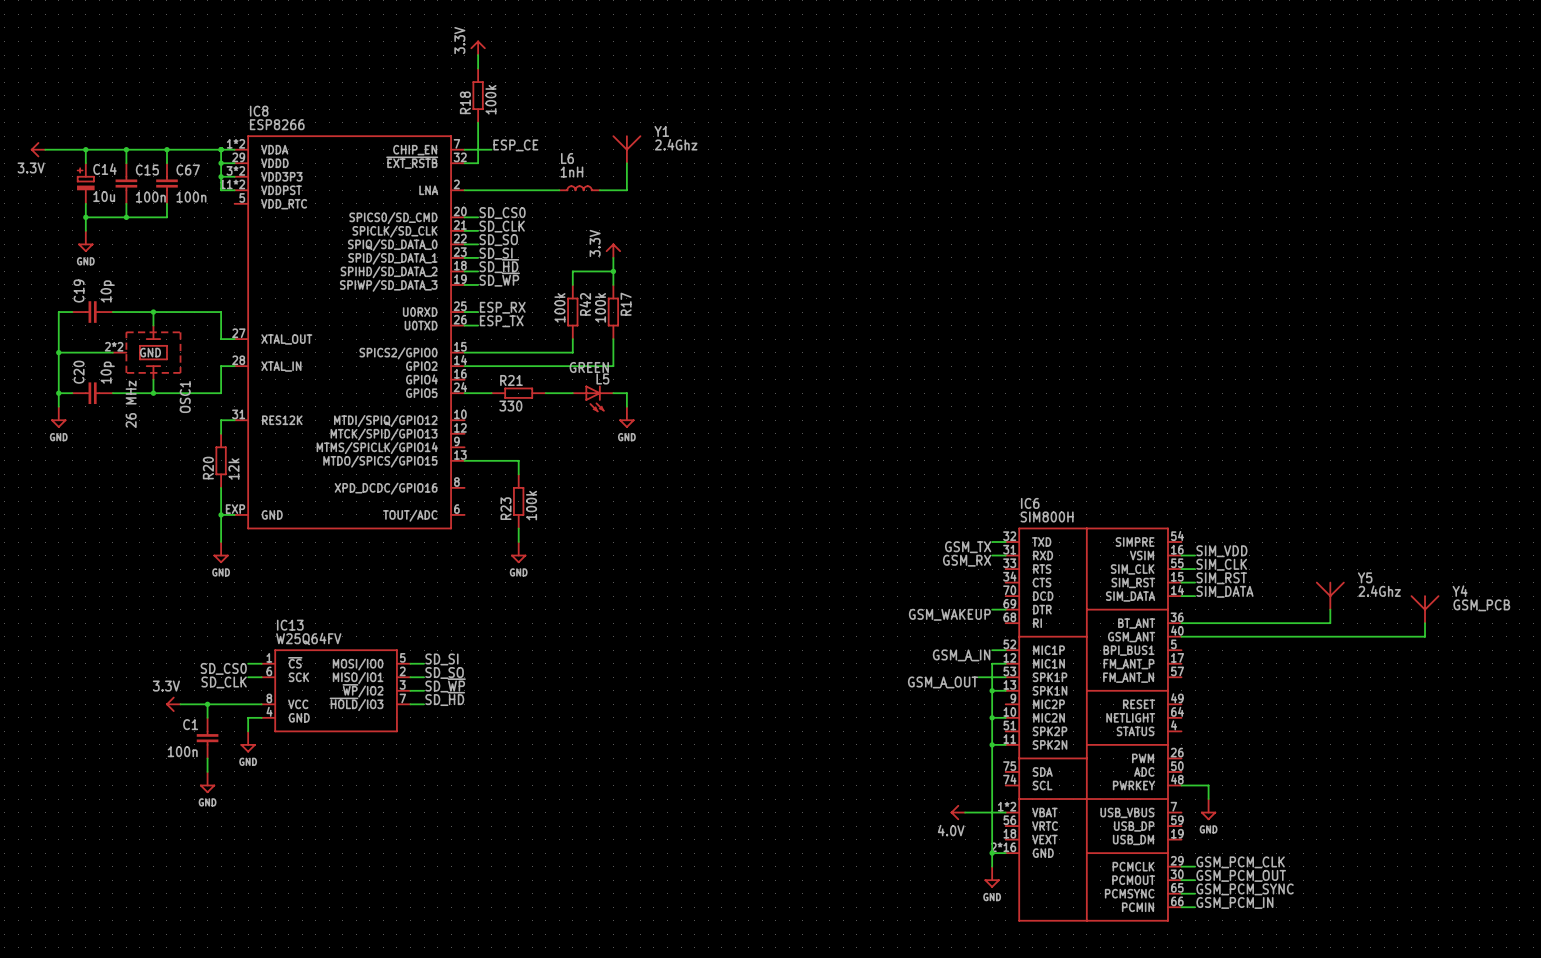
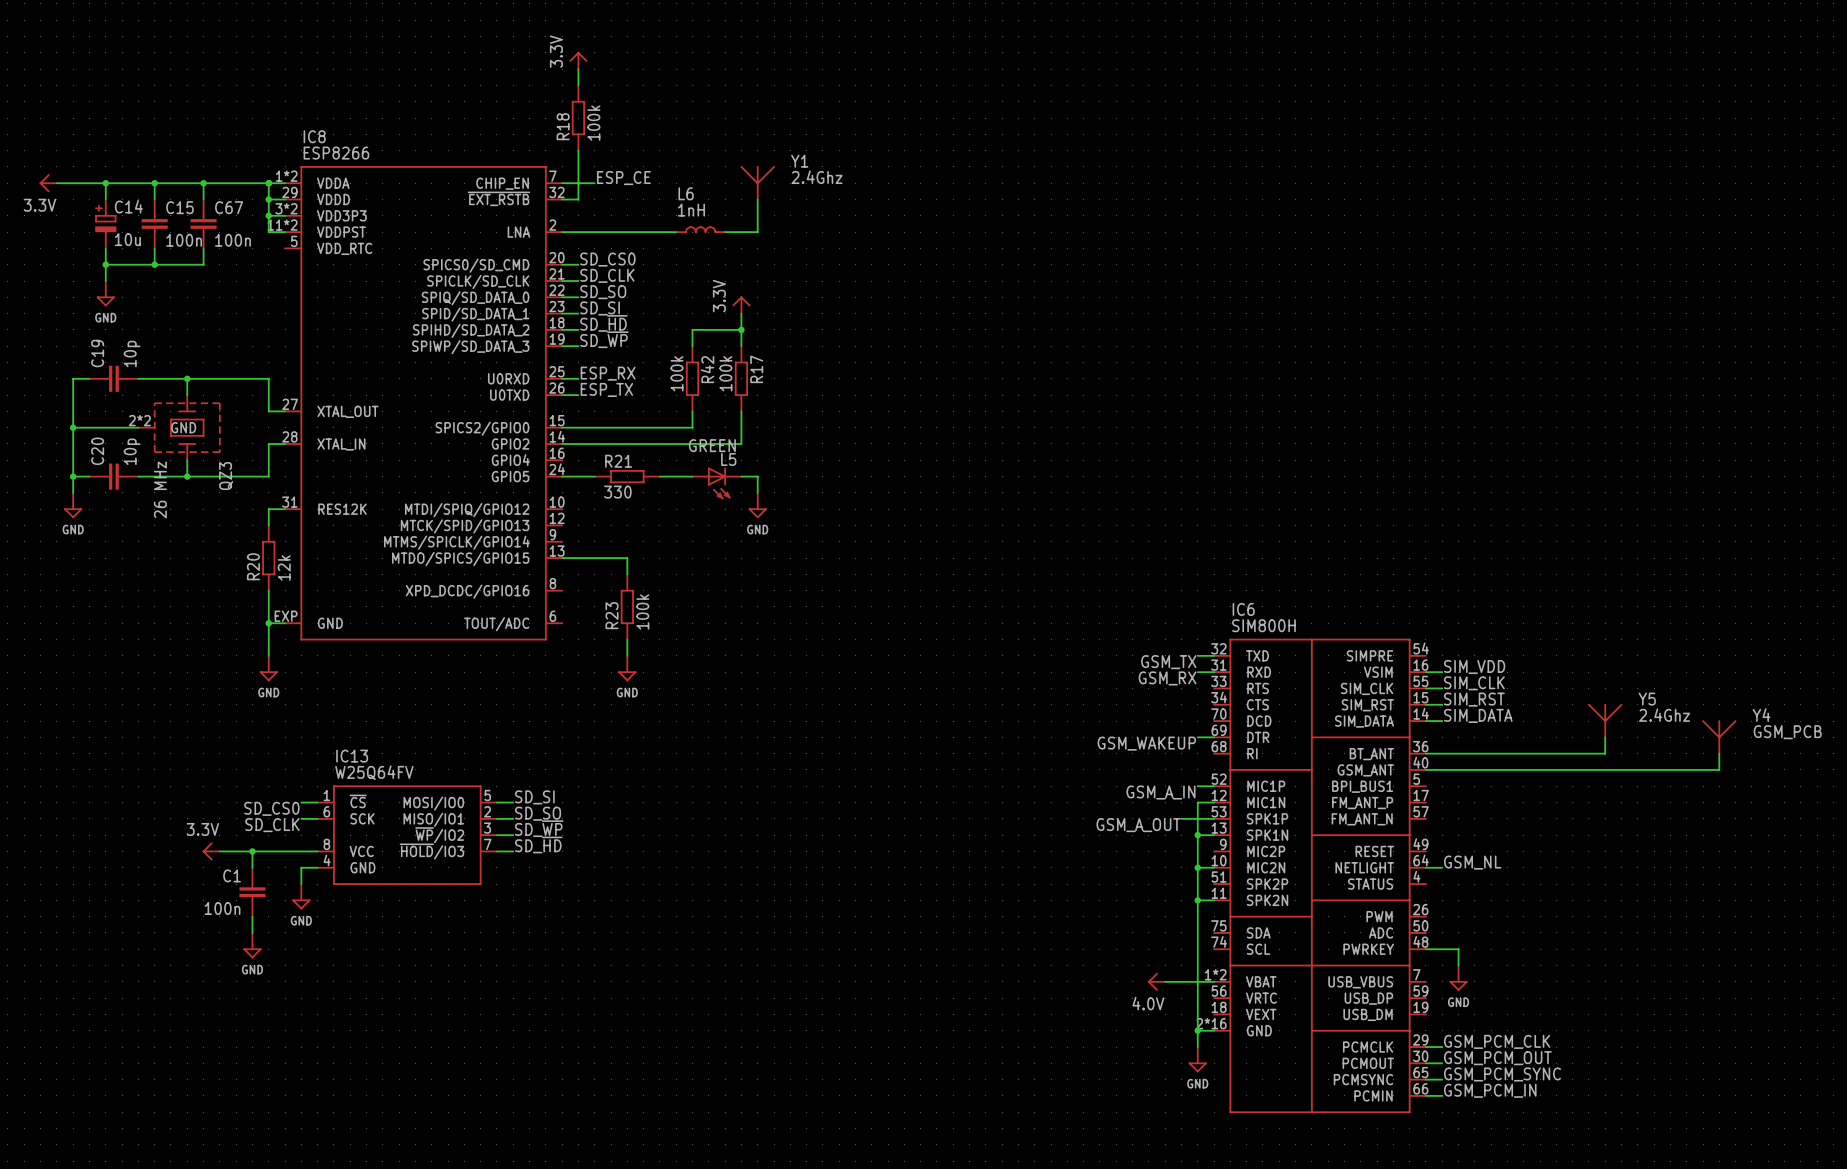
OSC1 name: OSC1 (185, 397) -> QZ3 (226, 476)
label: none -> GSM_NL (1472, 862)
wire: none -> (1425, 867) (1442, 867)

